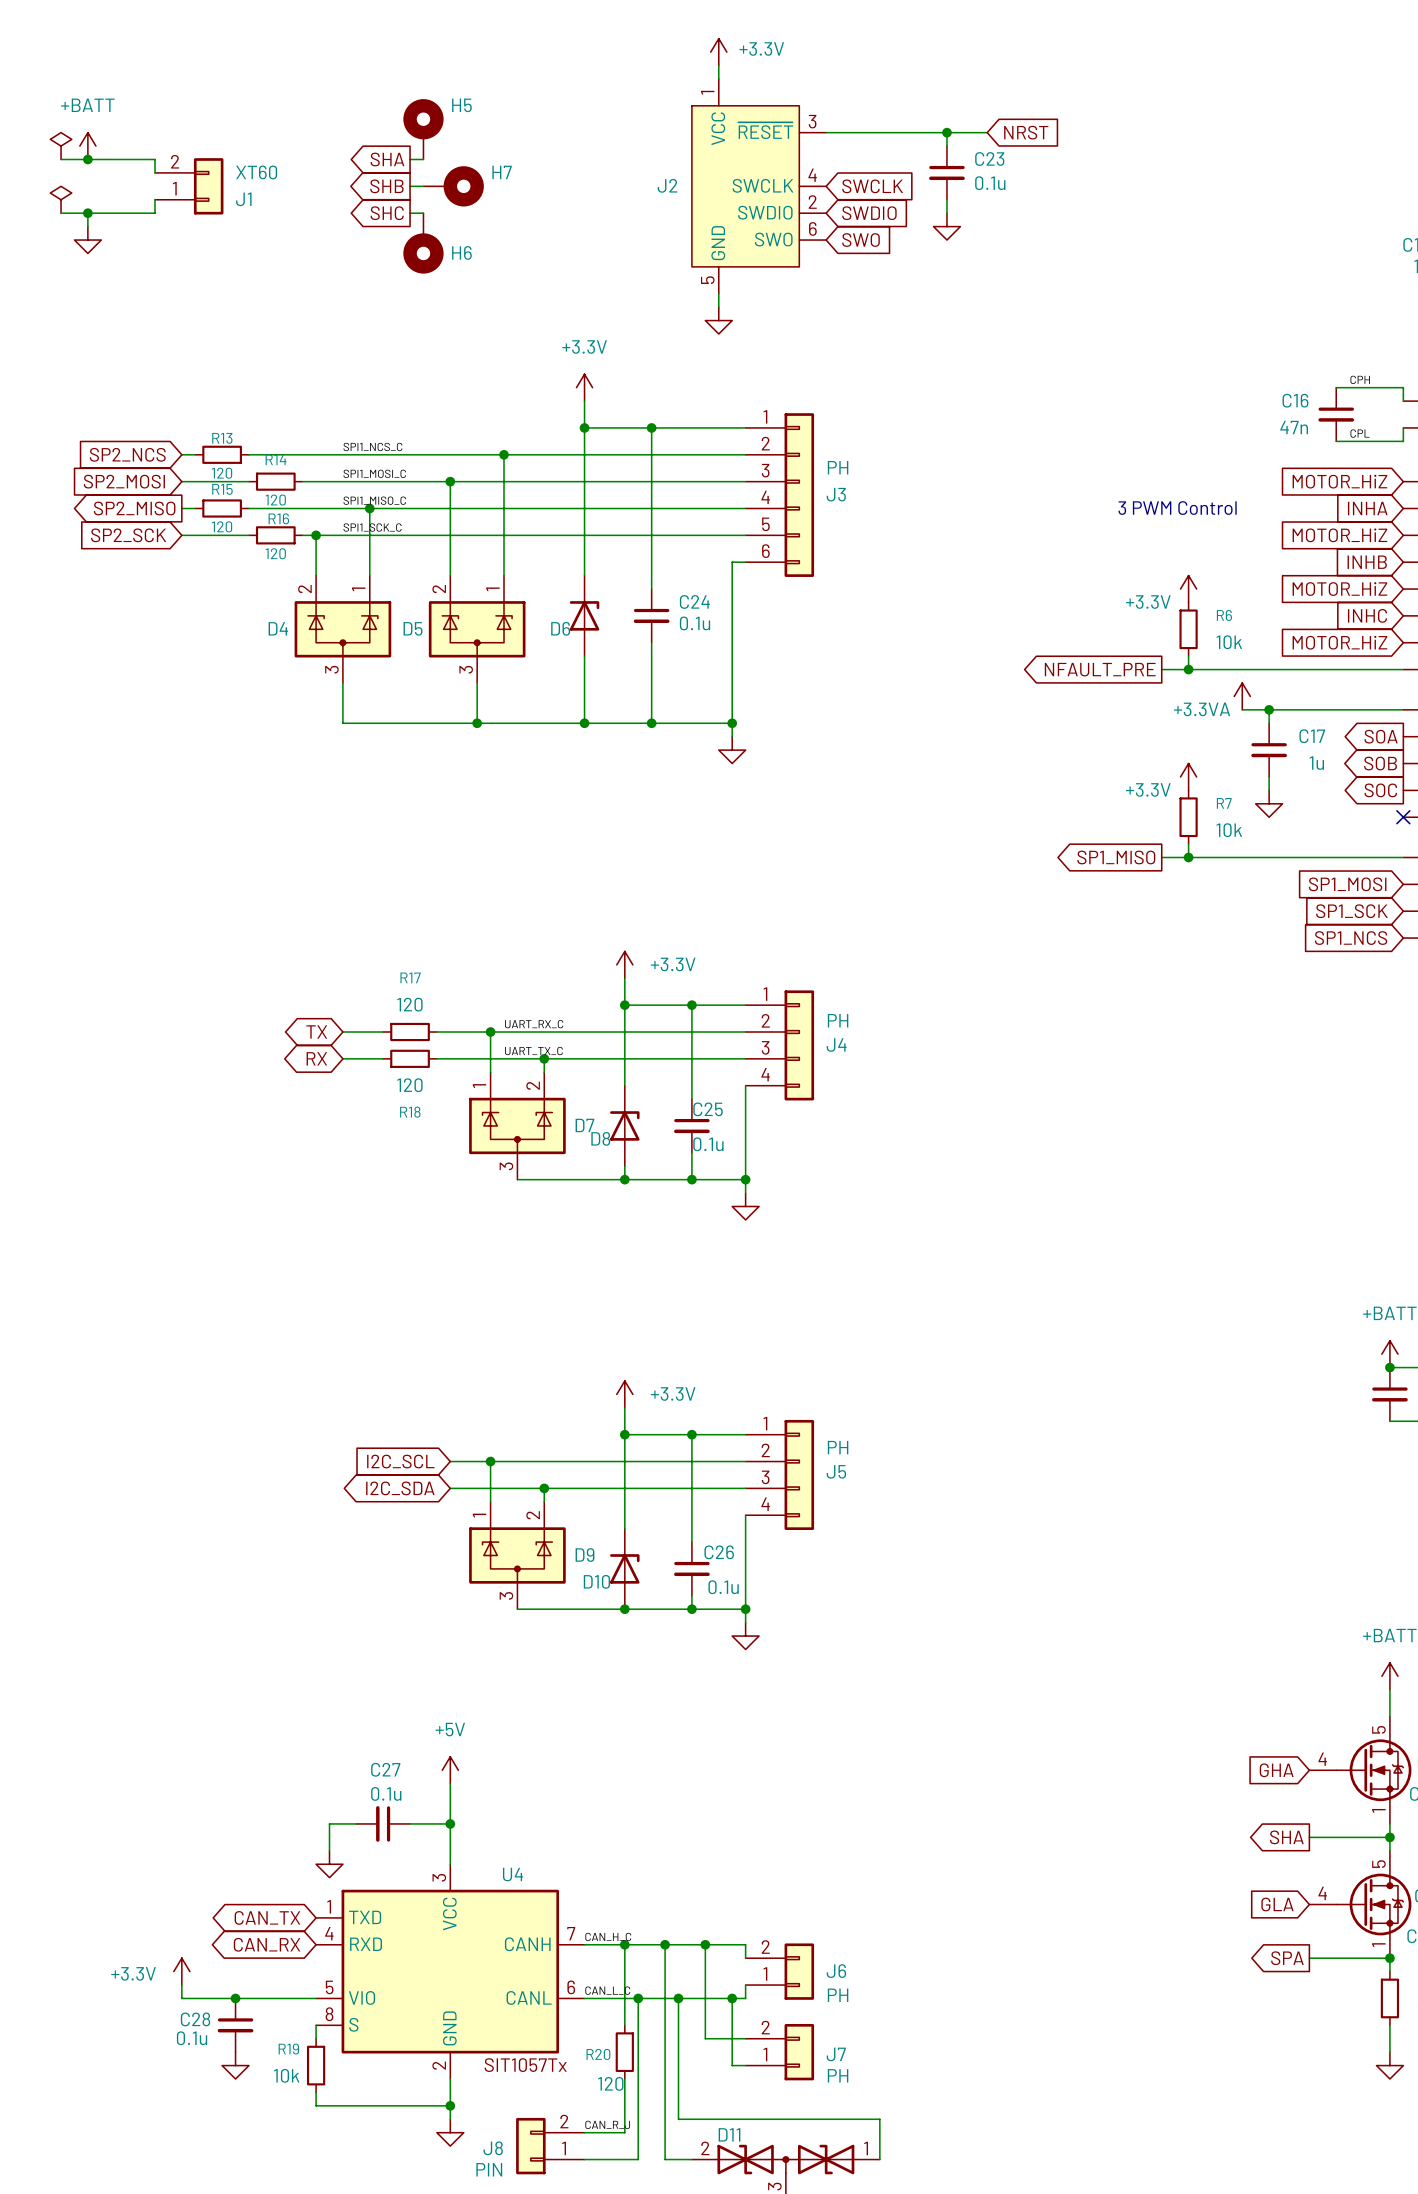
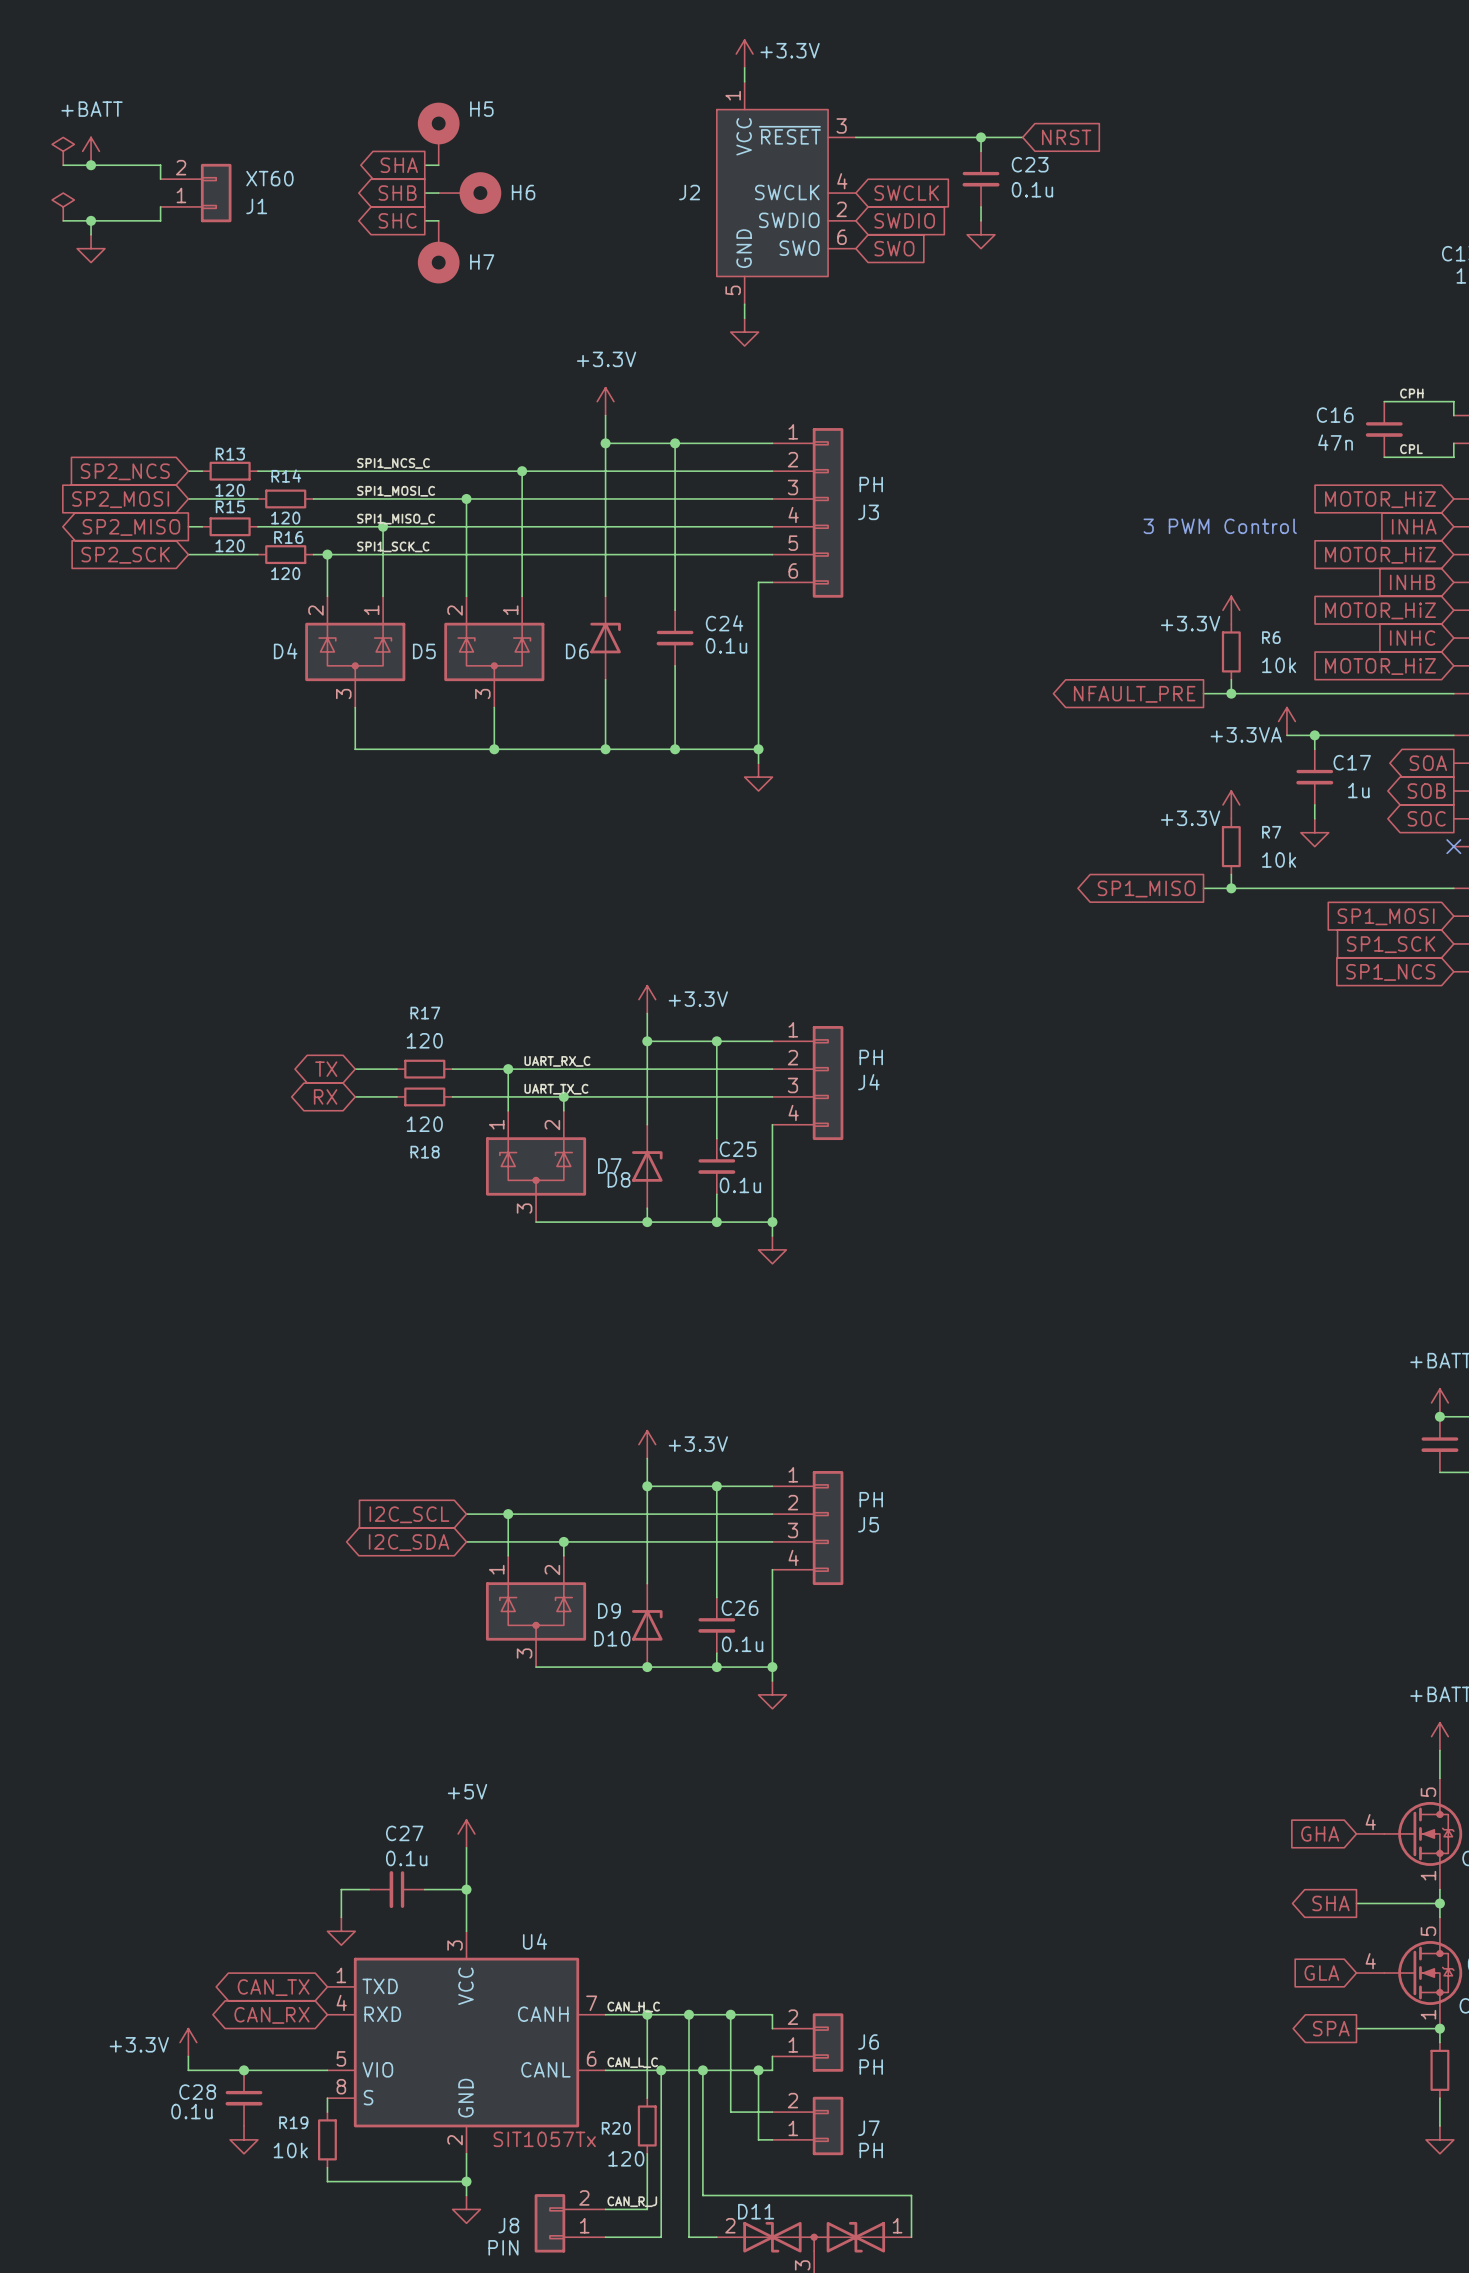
H7 name: H7 (502, 172) -> H6 (523, 192)
H6 name: H6 (461, 252) -> H7 (482, 262)

